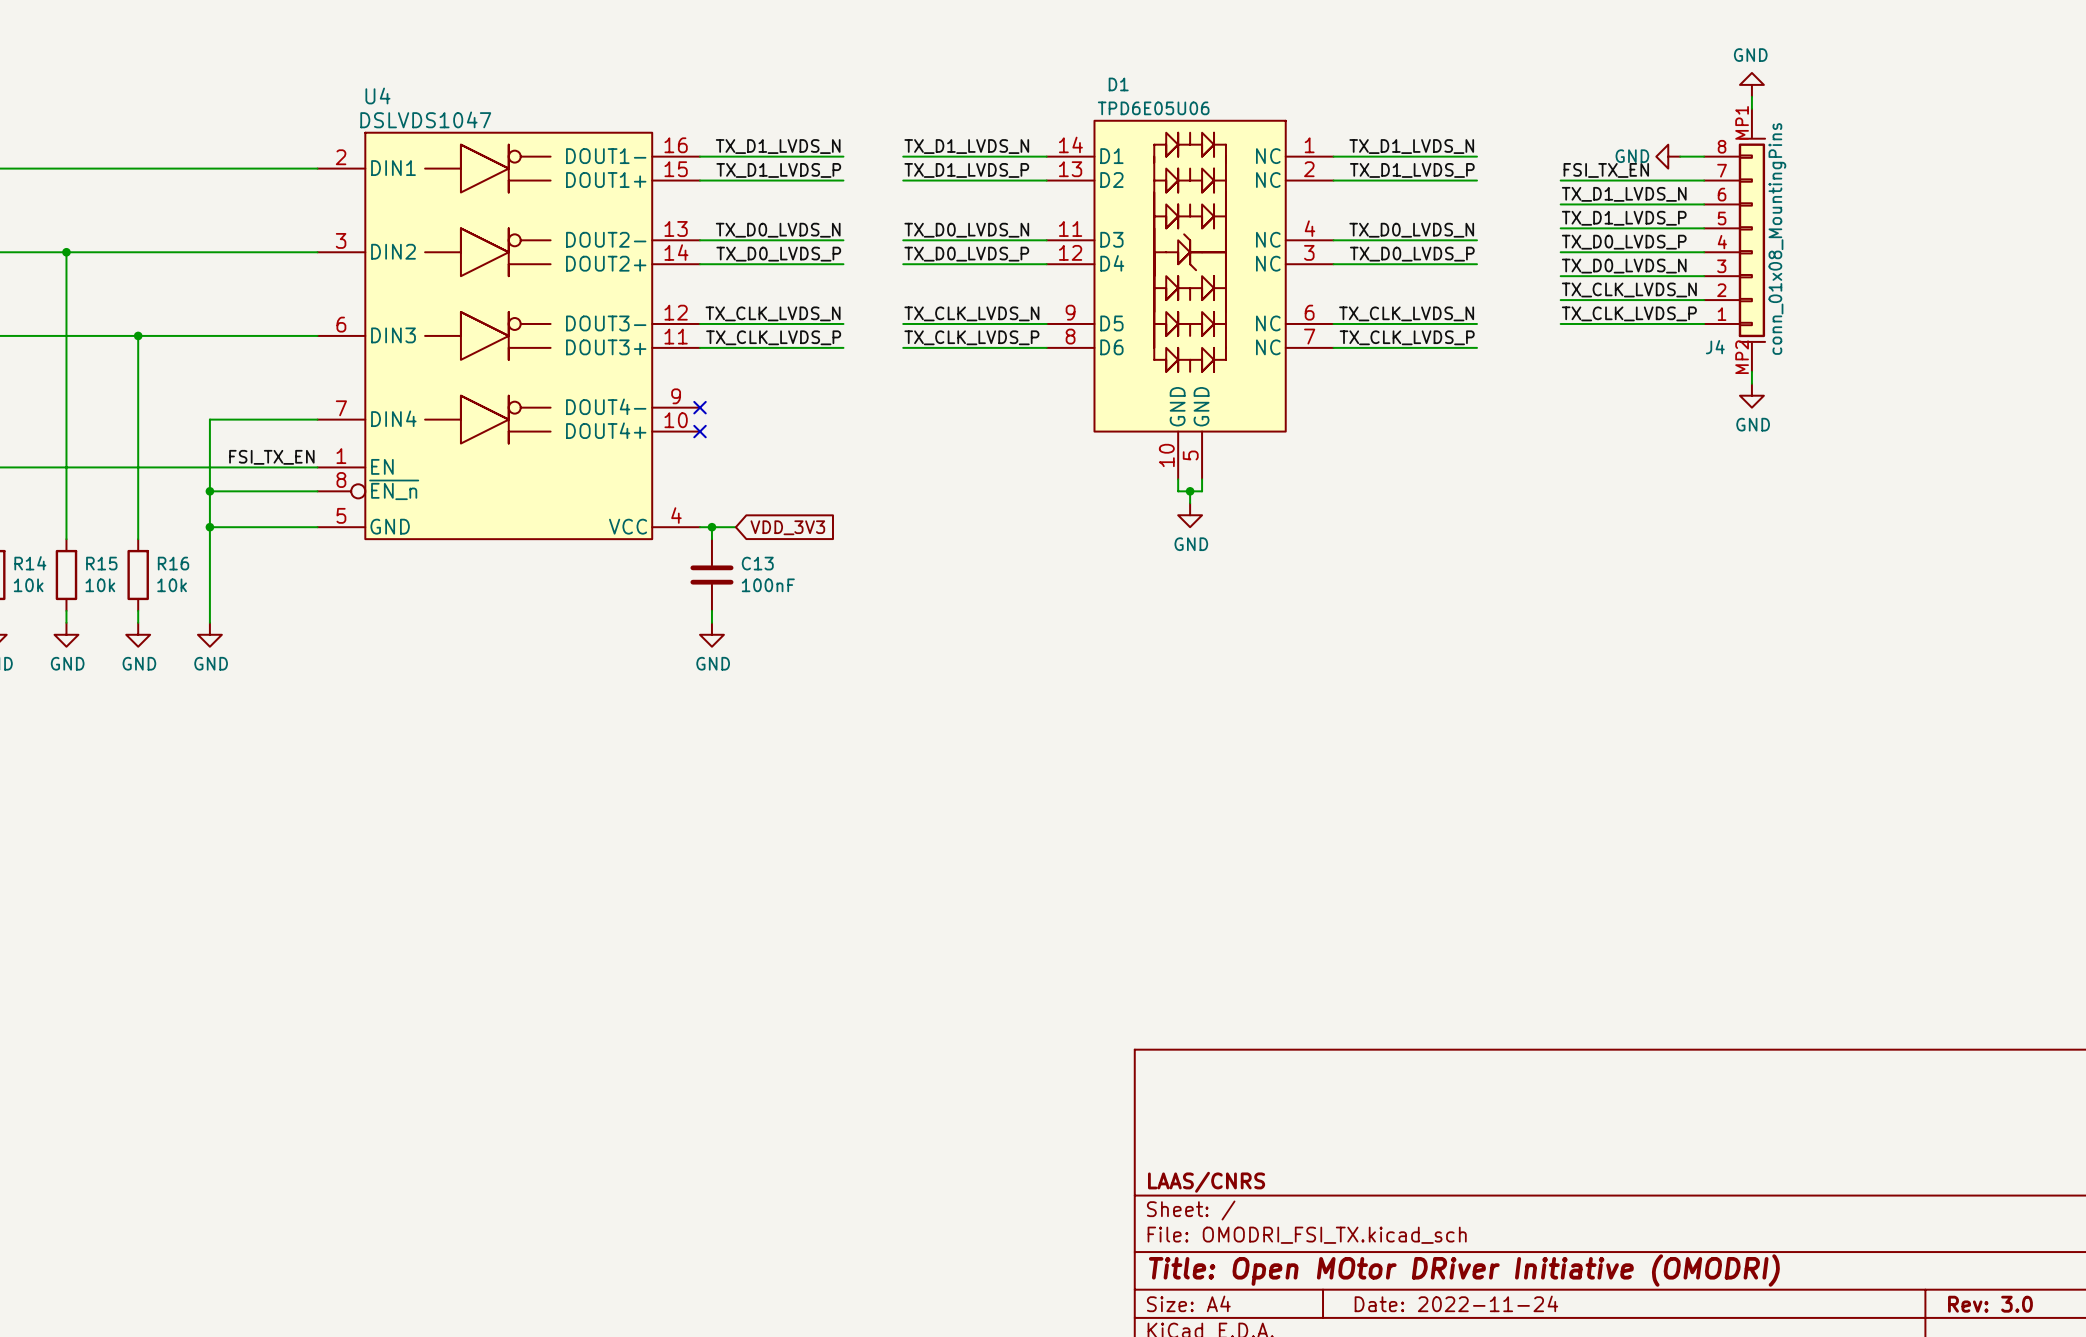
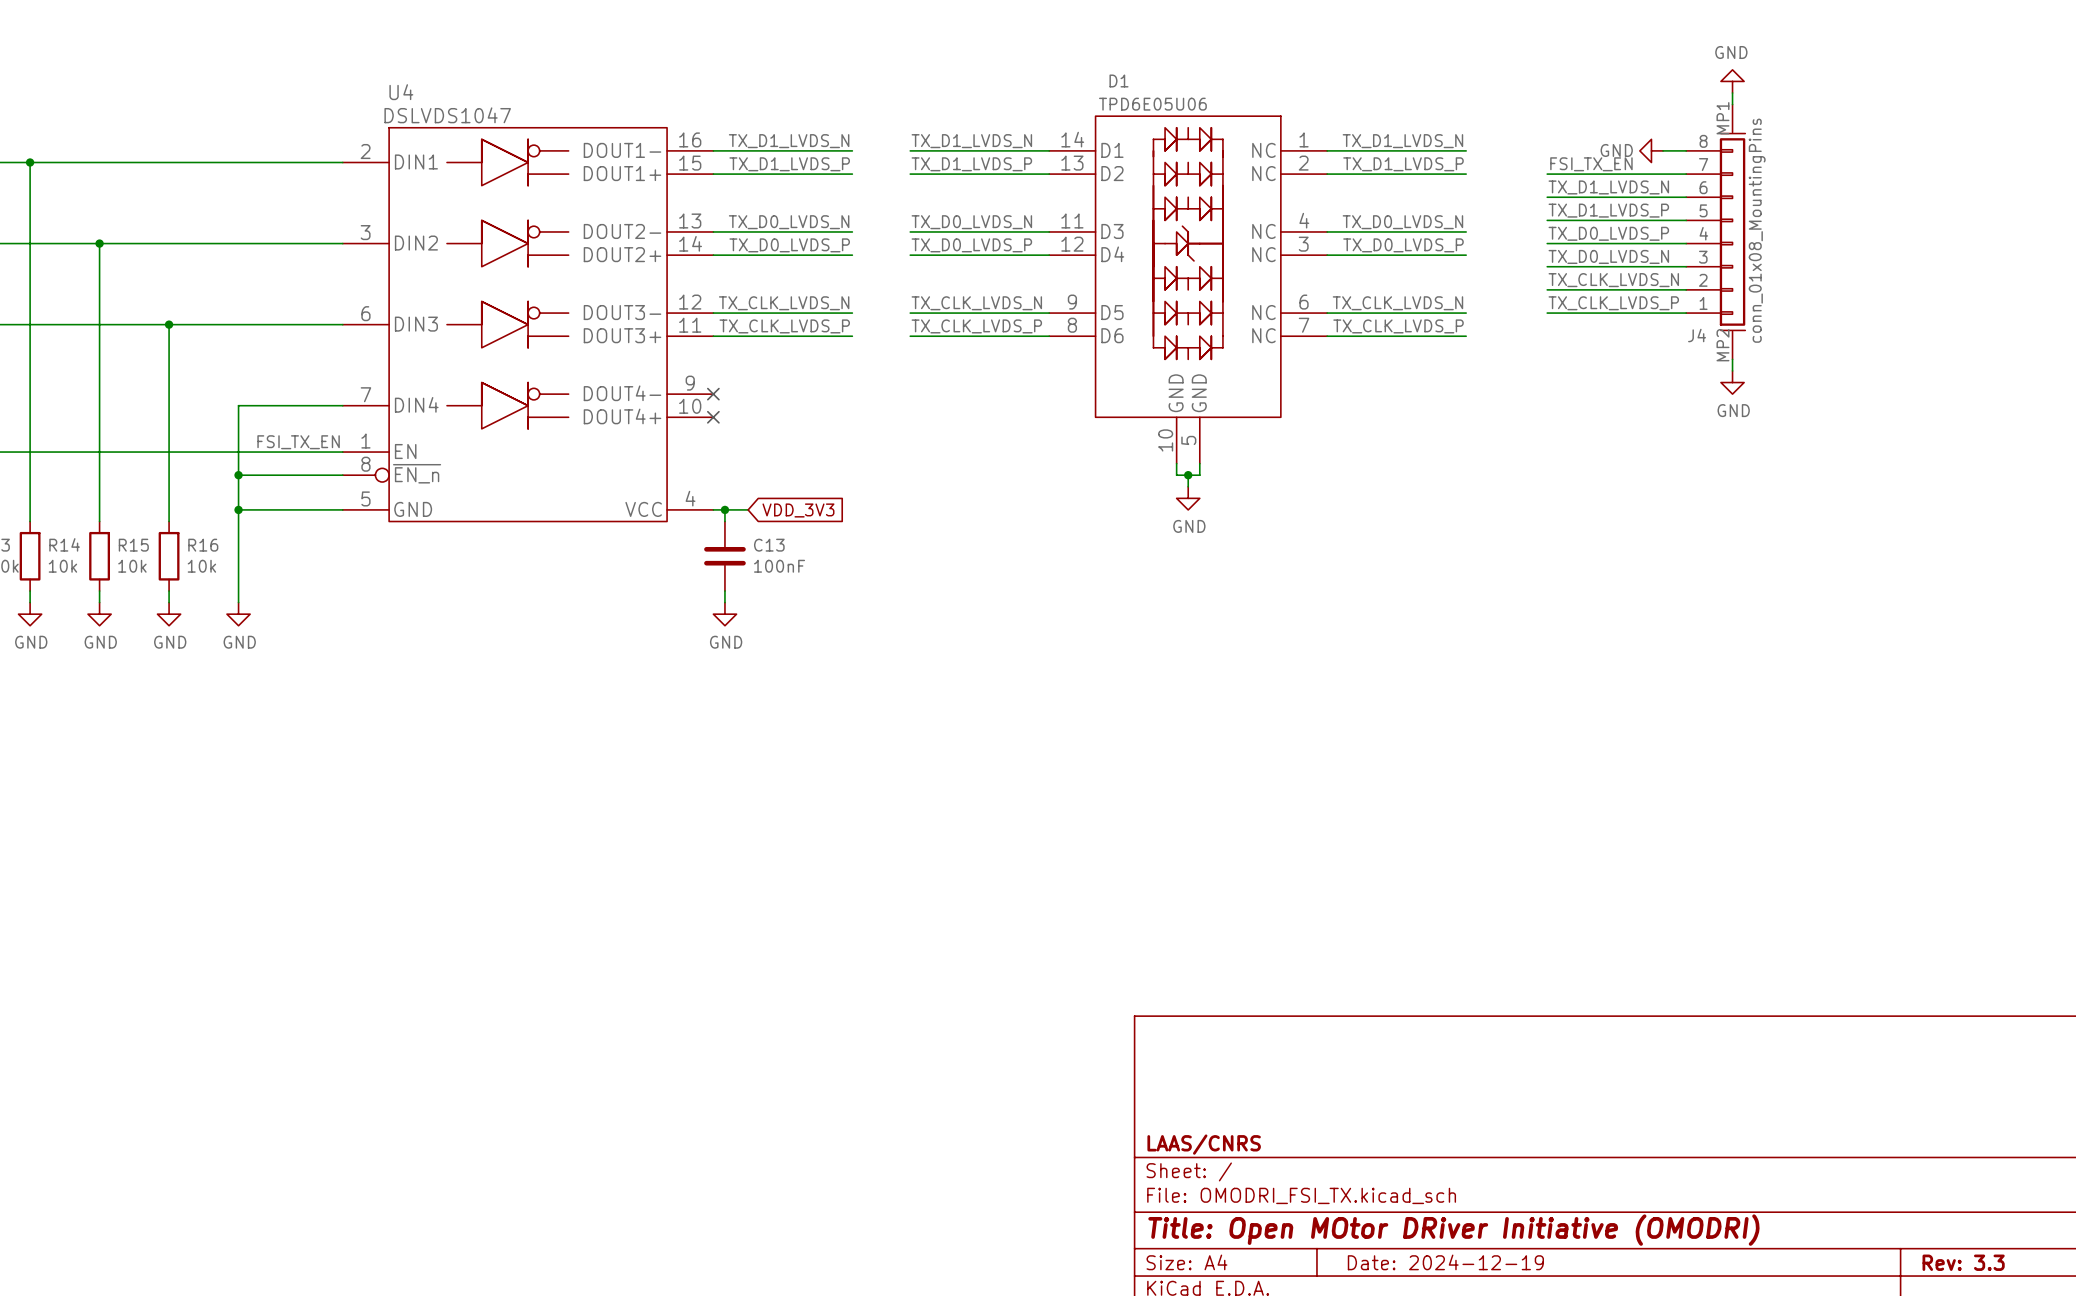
title block: Date: 2022-11-24 (1456, 1303) -> Date: 2024-12-19 (1445, 1262)
title block: Rev: 3.0 (1990, 1304) -> Rev: 3.3 (1963, 1262)

